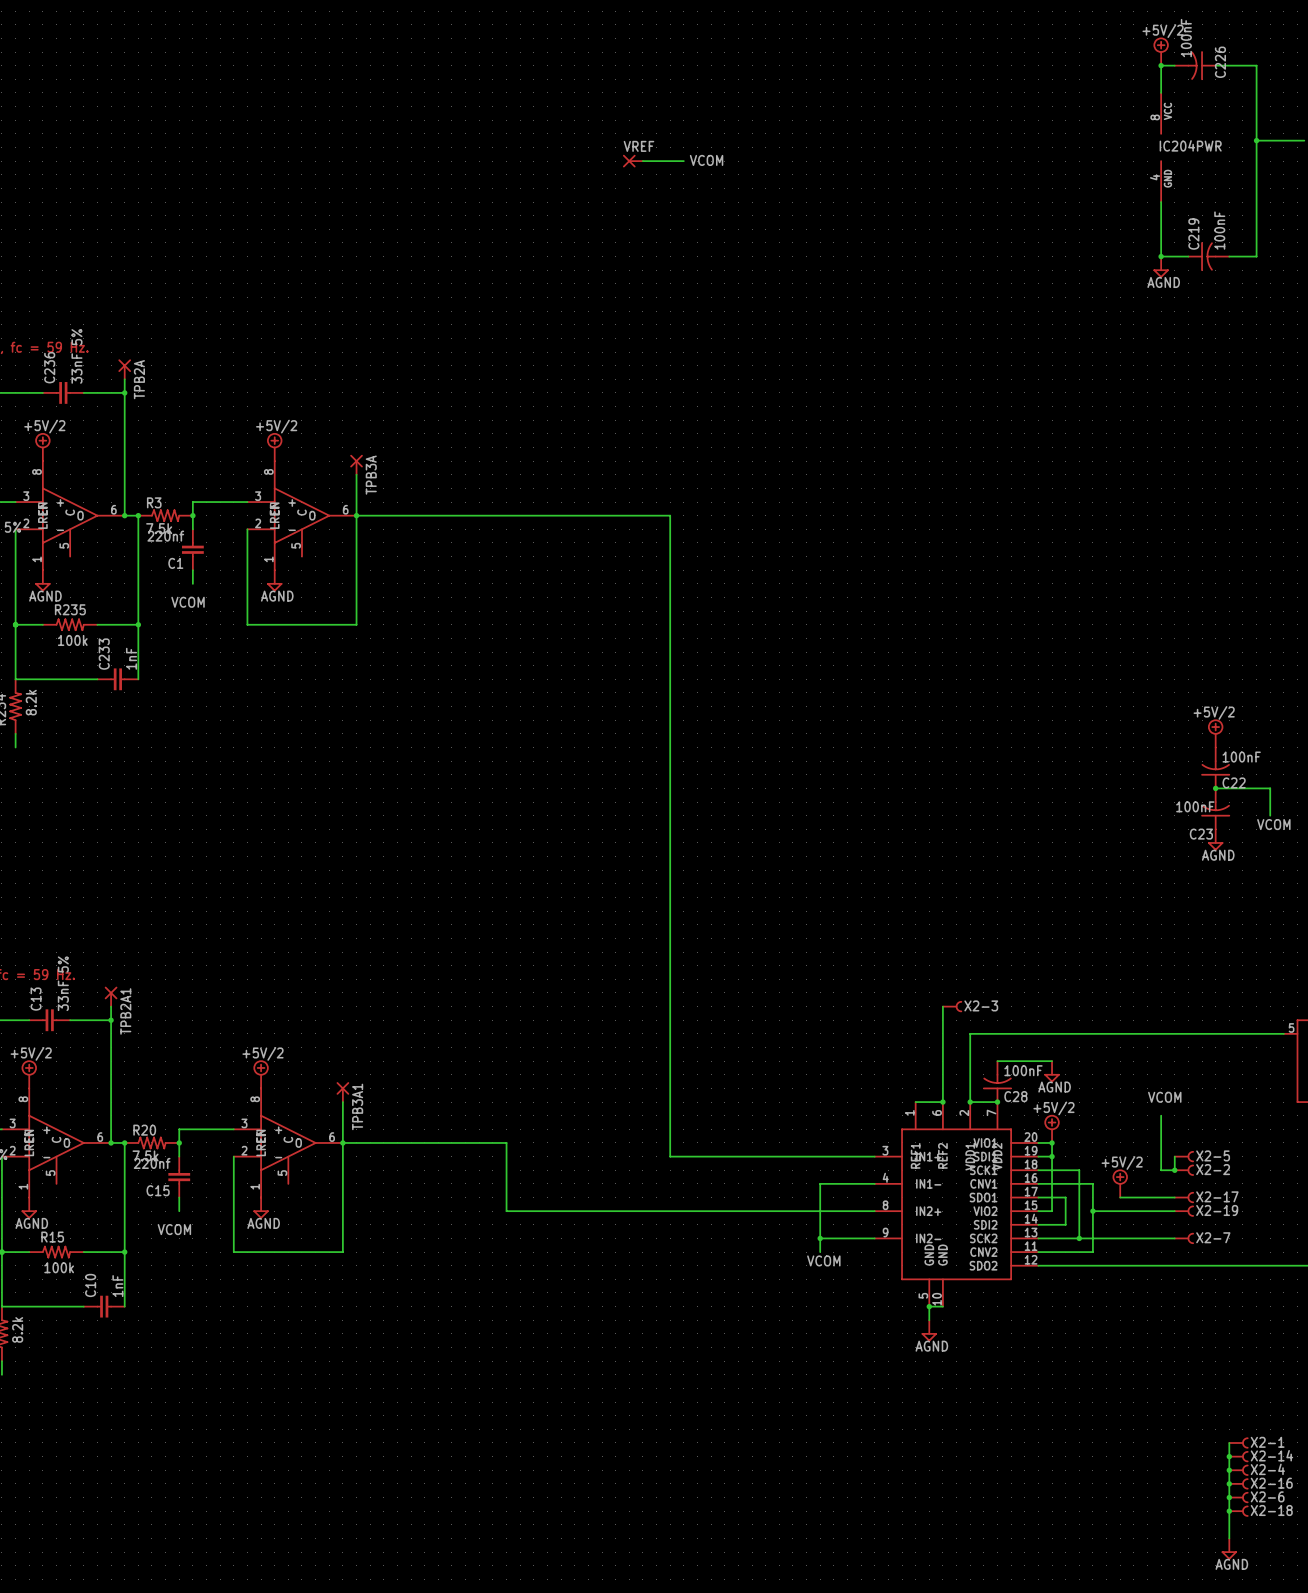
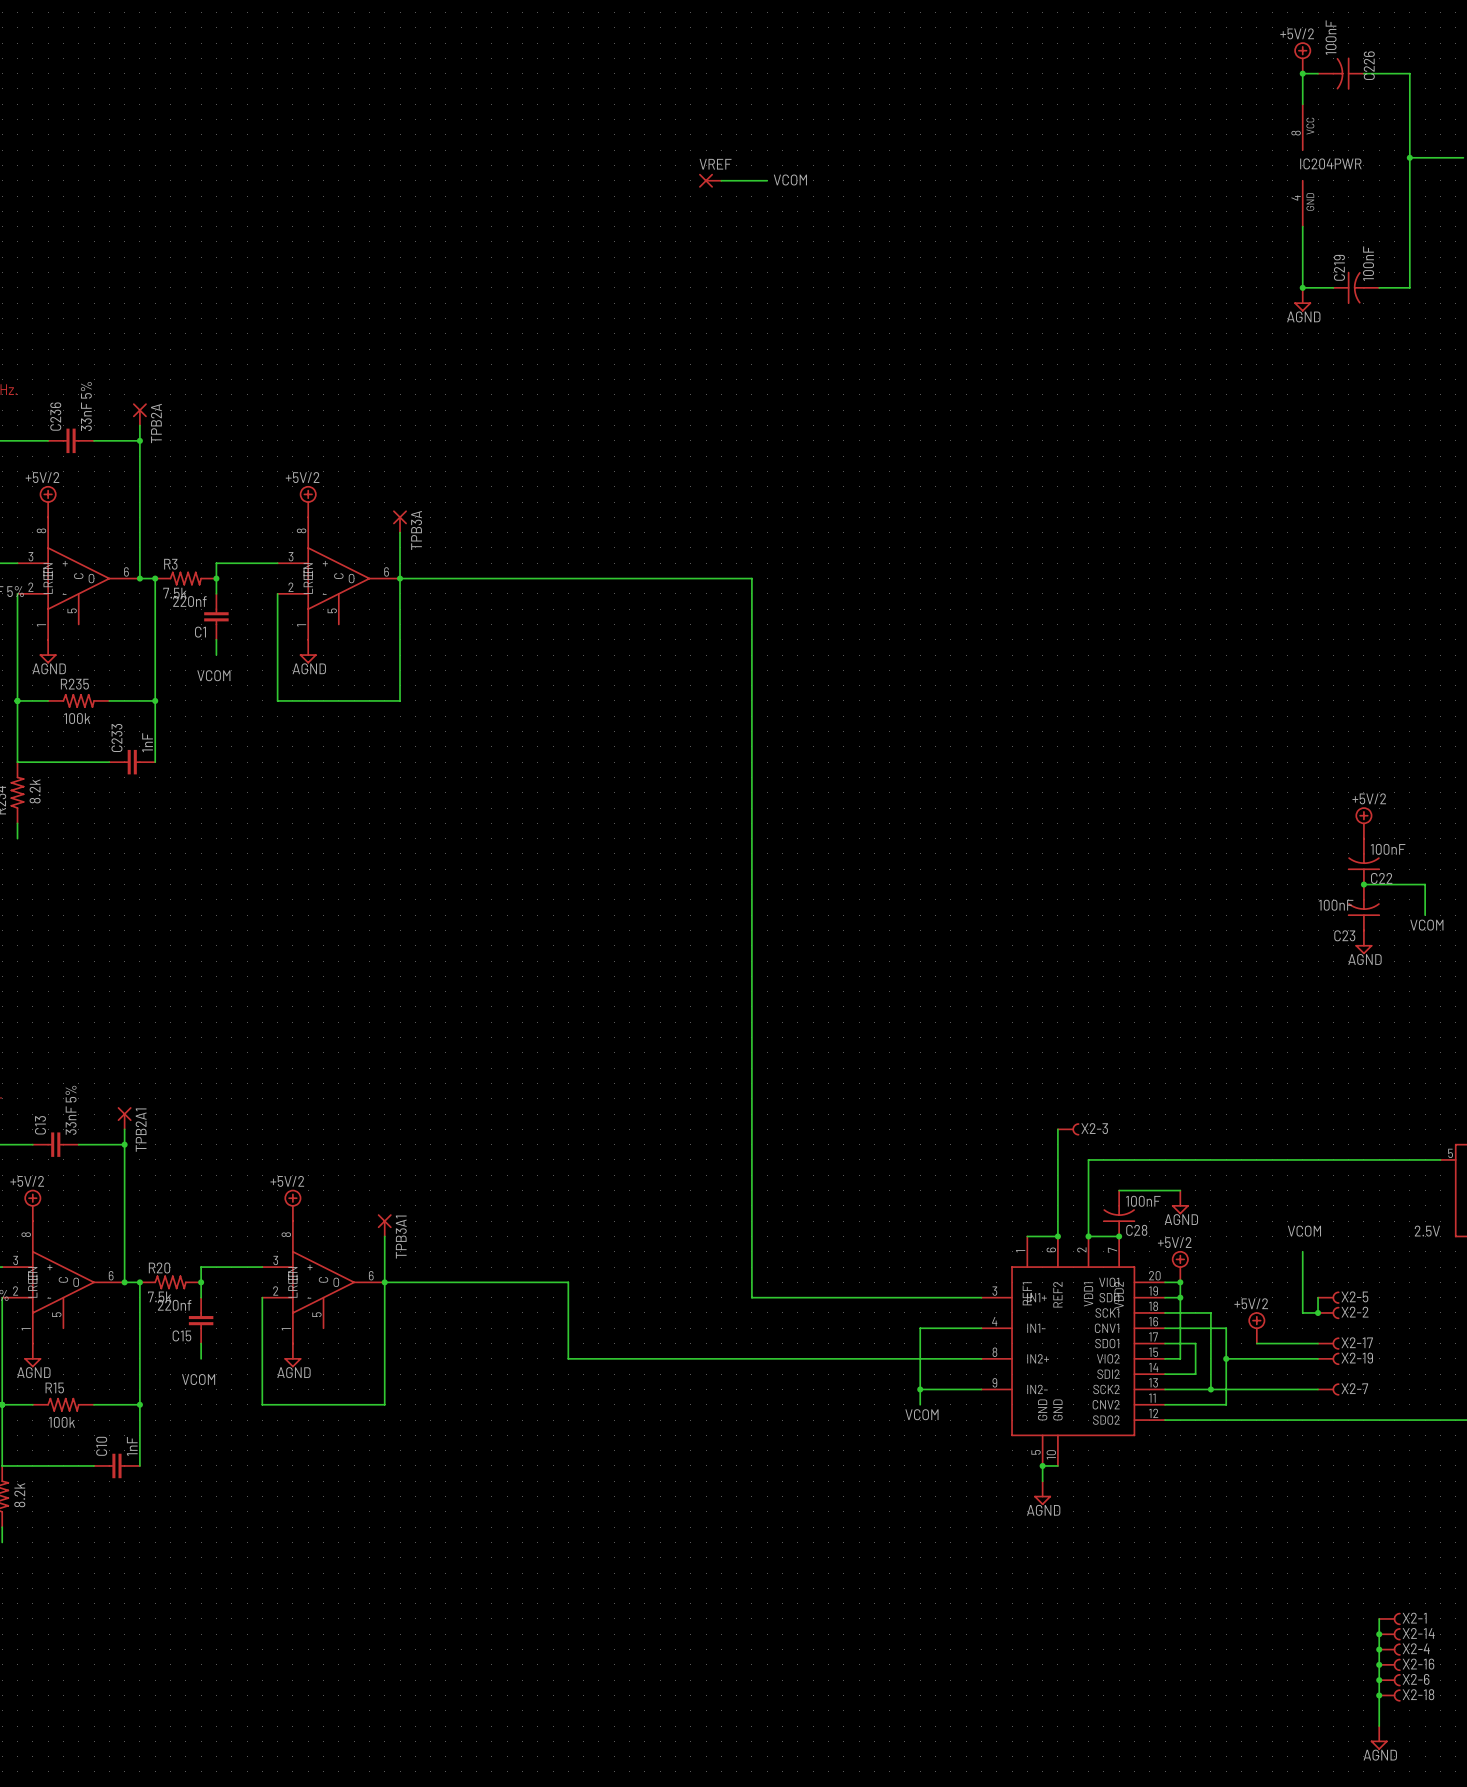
part value: none -> 2.5V (1427, 1231)

